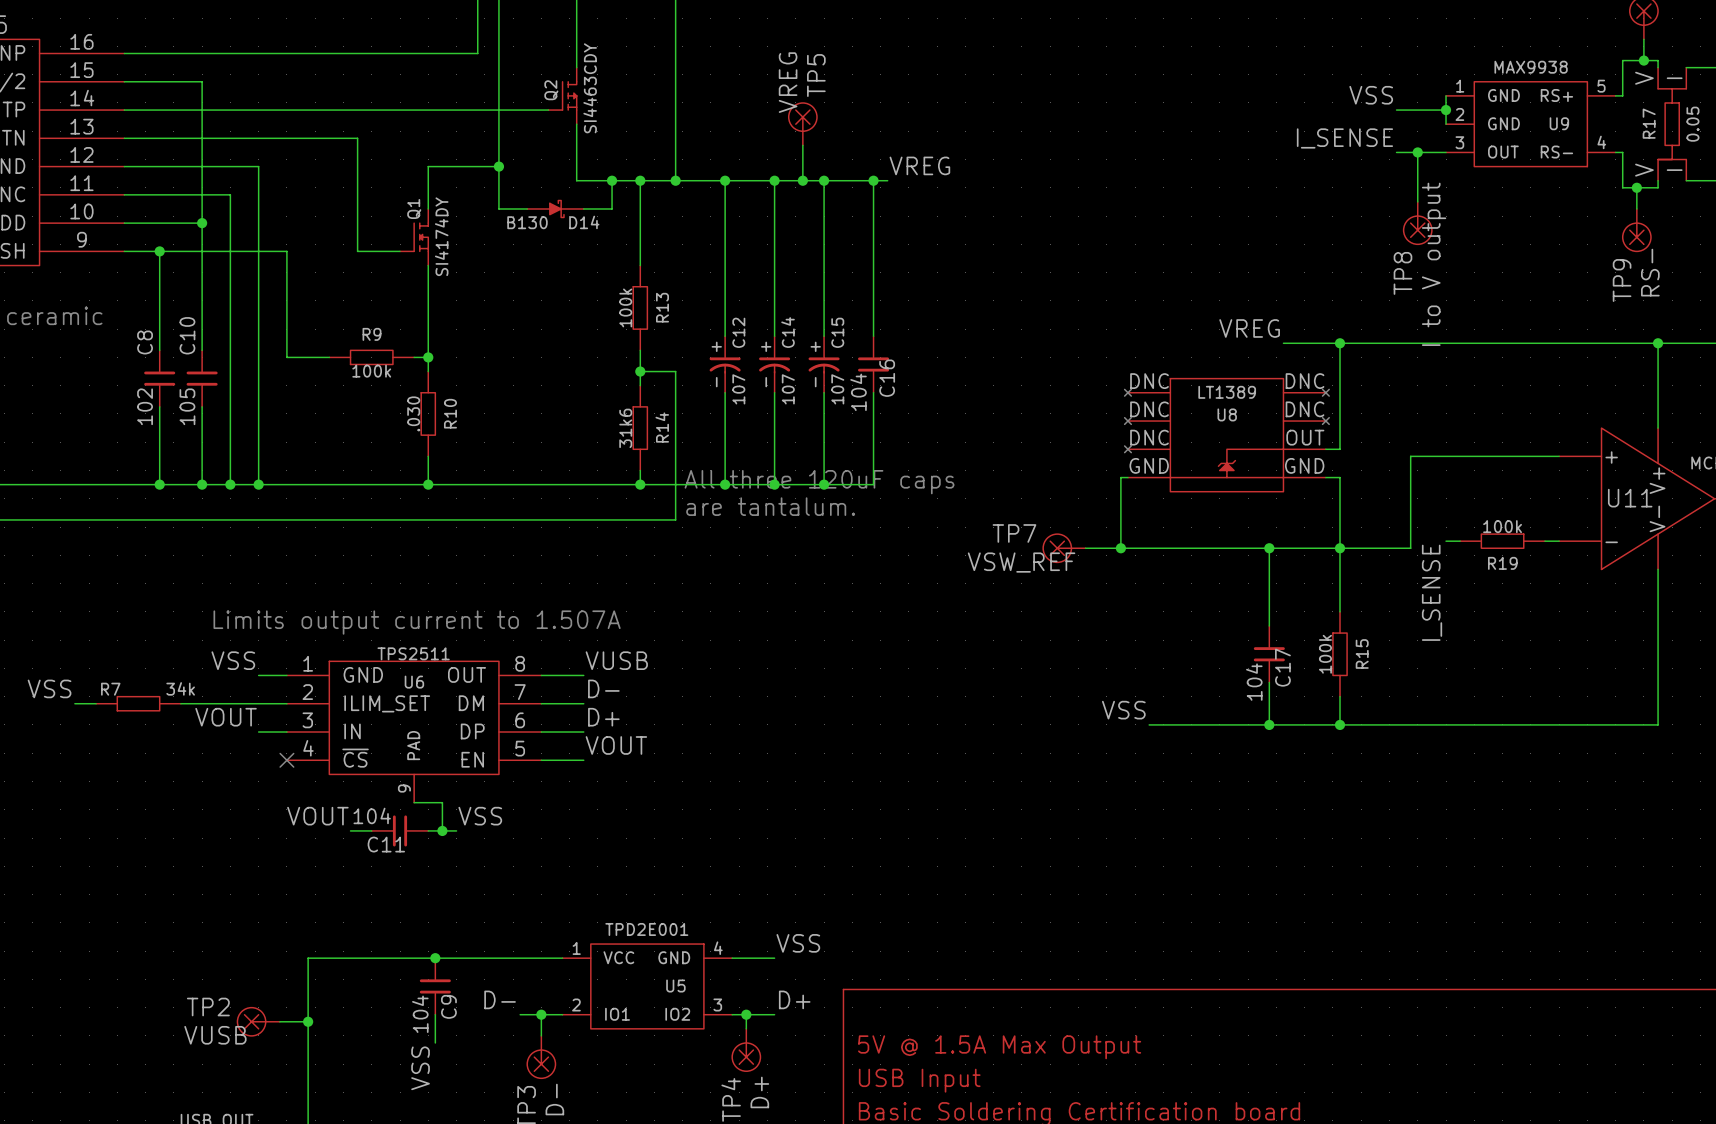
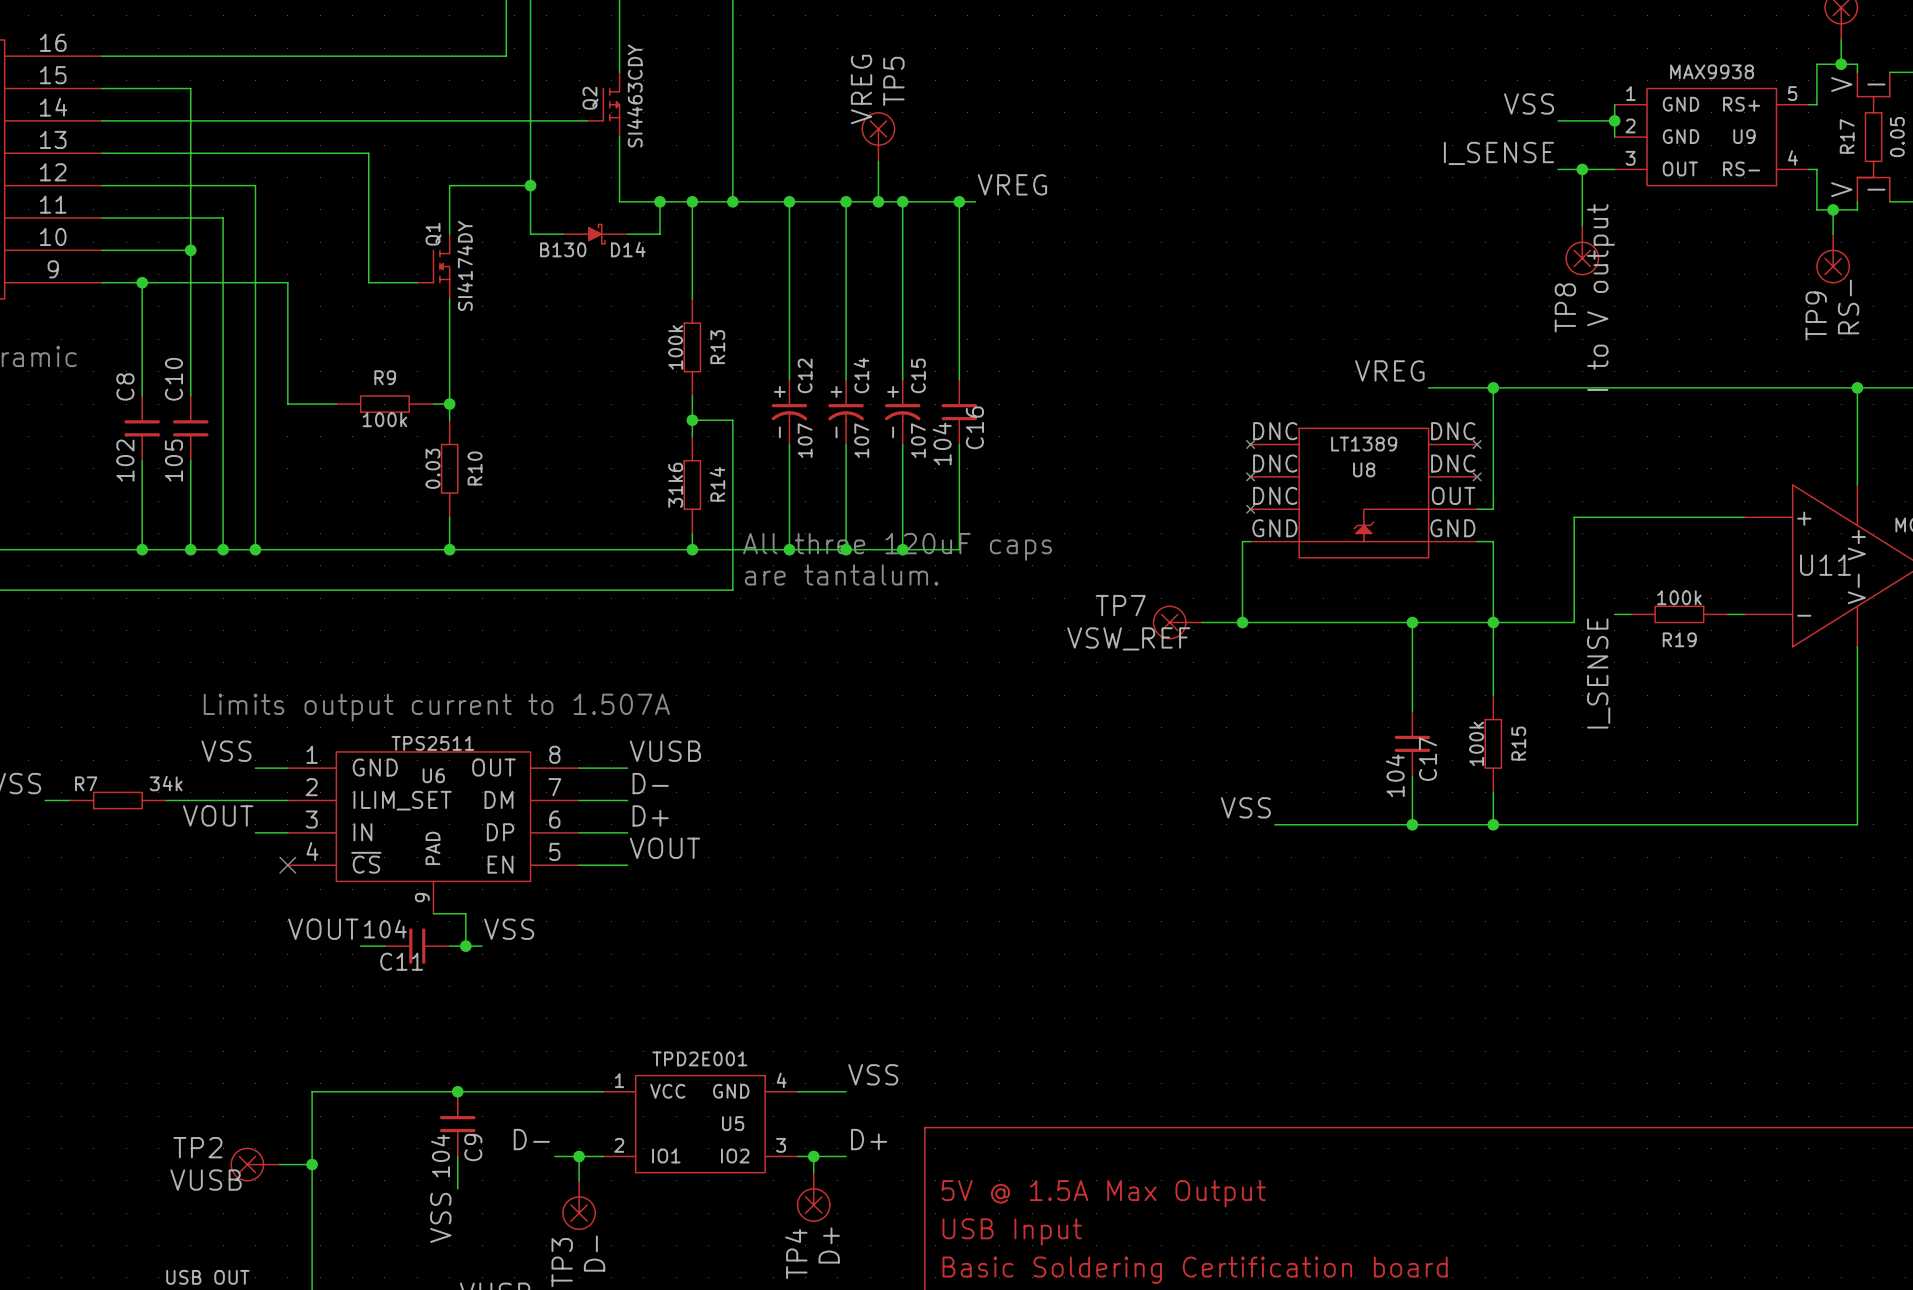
R10 value: .030 (413, 413) -> 0.03 (432, 468)

